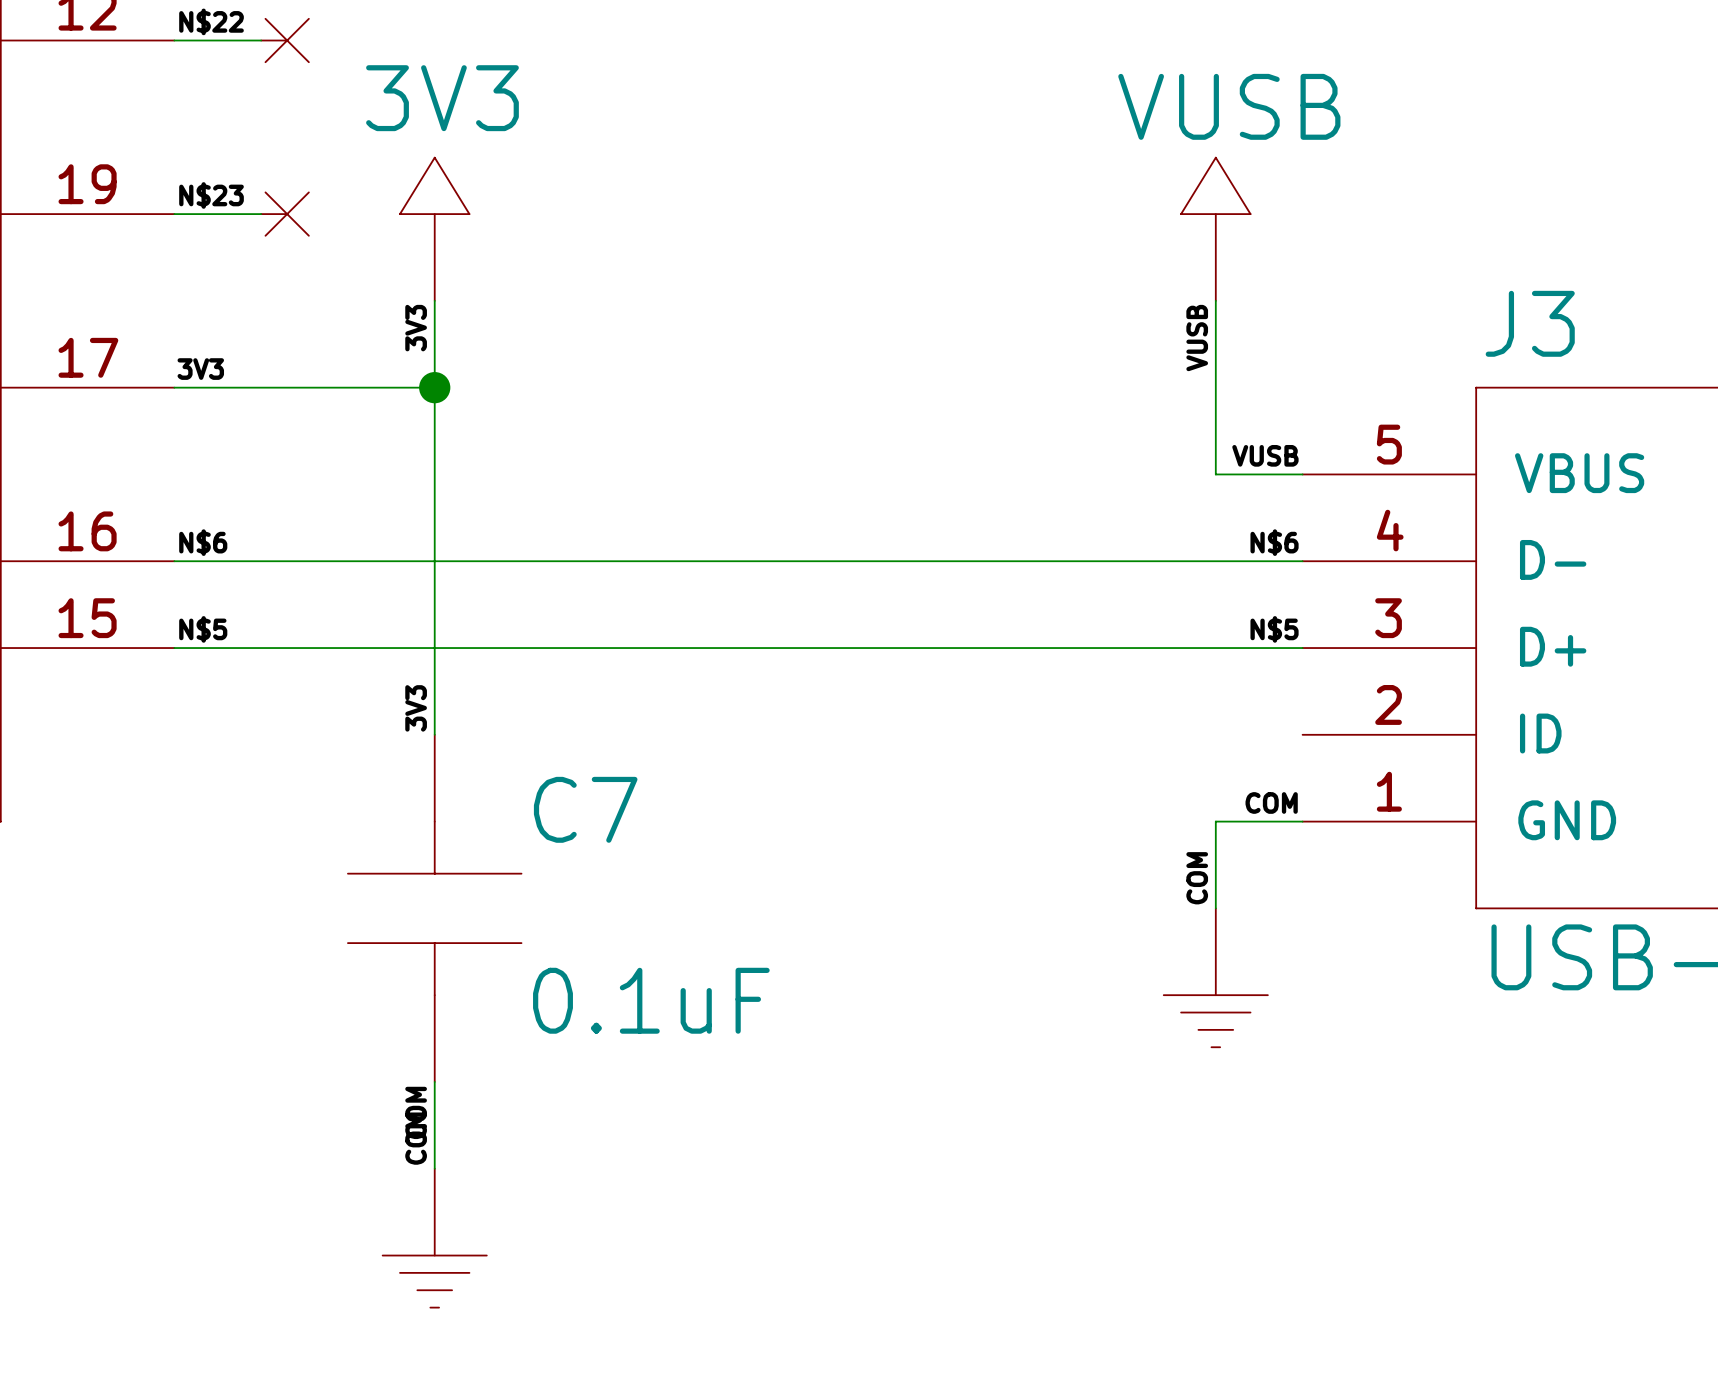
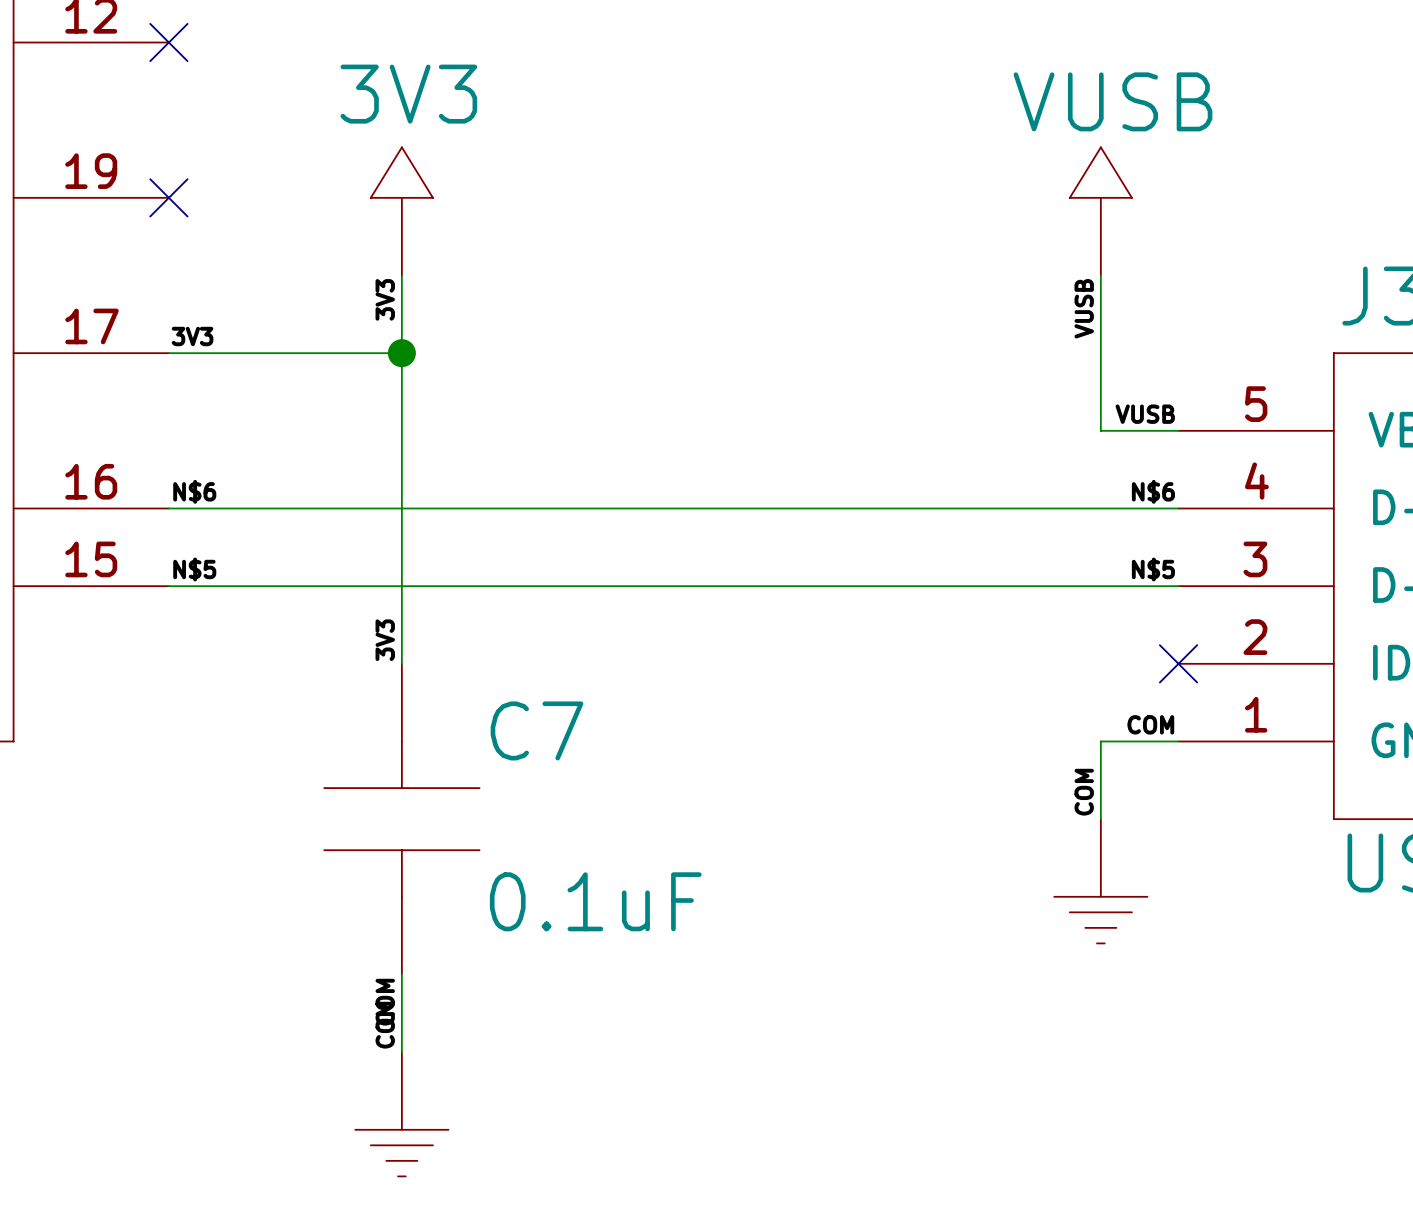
label: N$22 (211, 21) -> none
wire: (174, 40) (261, 40) -> none
no-connect mark: none -> (168, 42)
power symbol: (285, 40) -> none
label: N$23 (211, 195) -> none
wire: (174, 214) (261, 214) -> none
no-connect mark: none -> (168, 197)
power symbol: (285, 214) -> none
no-connect mark: none -> (1178, 663)

